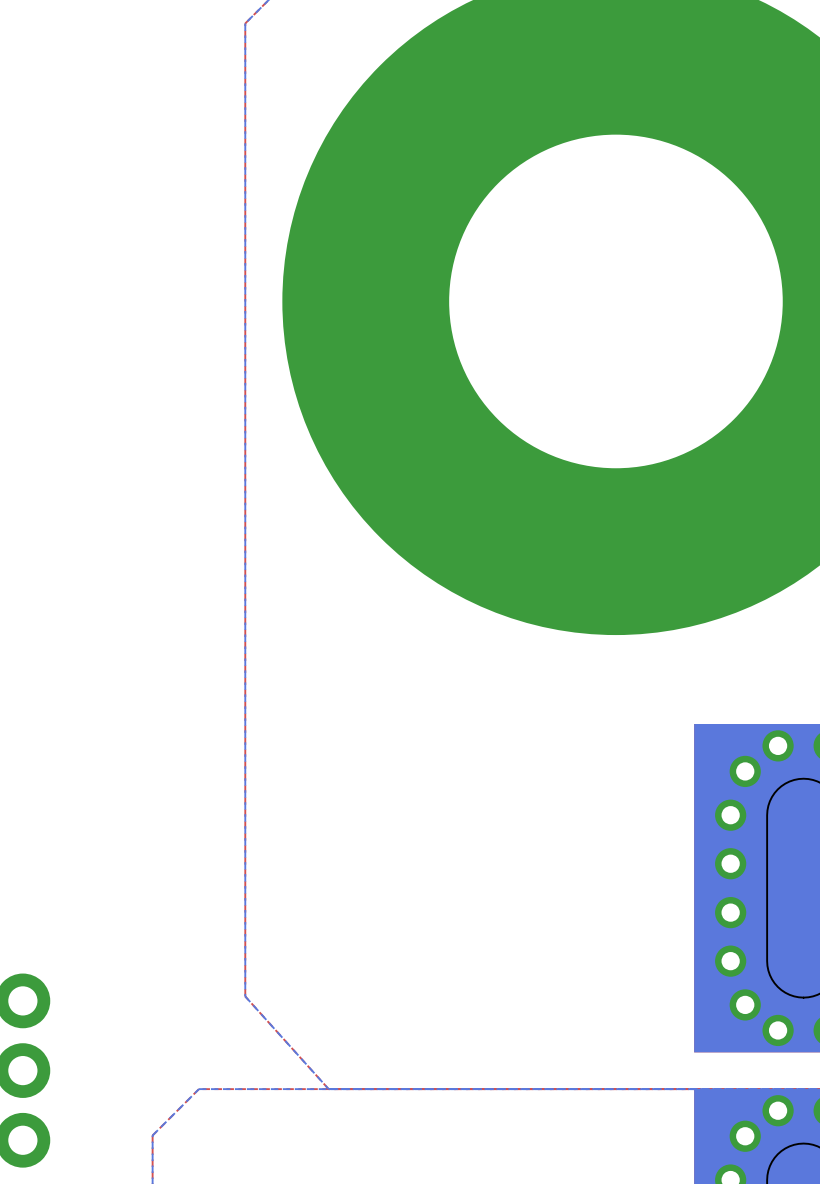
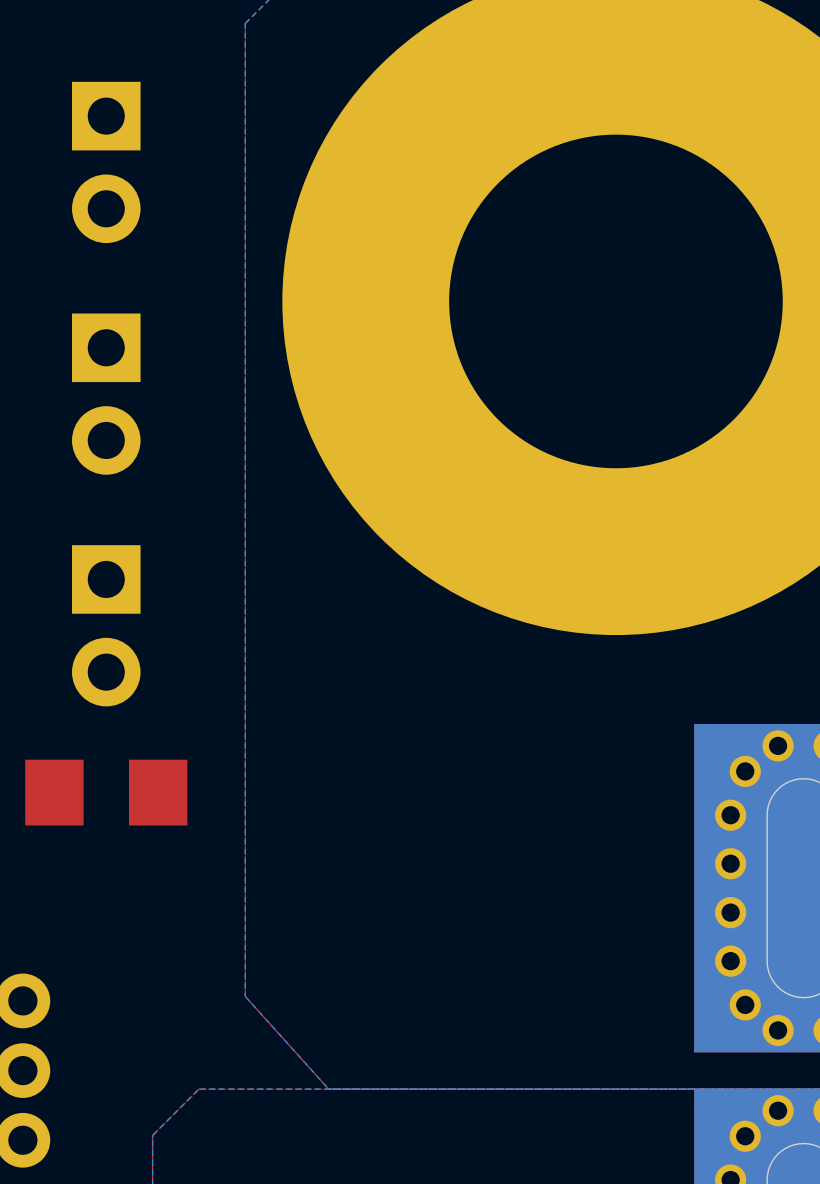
part: none -> (106, 162)
part: none -> (106, 394)
part: none -> (106, 625)
part: none -> (106, 792)

